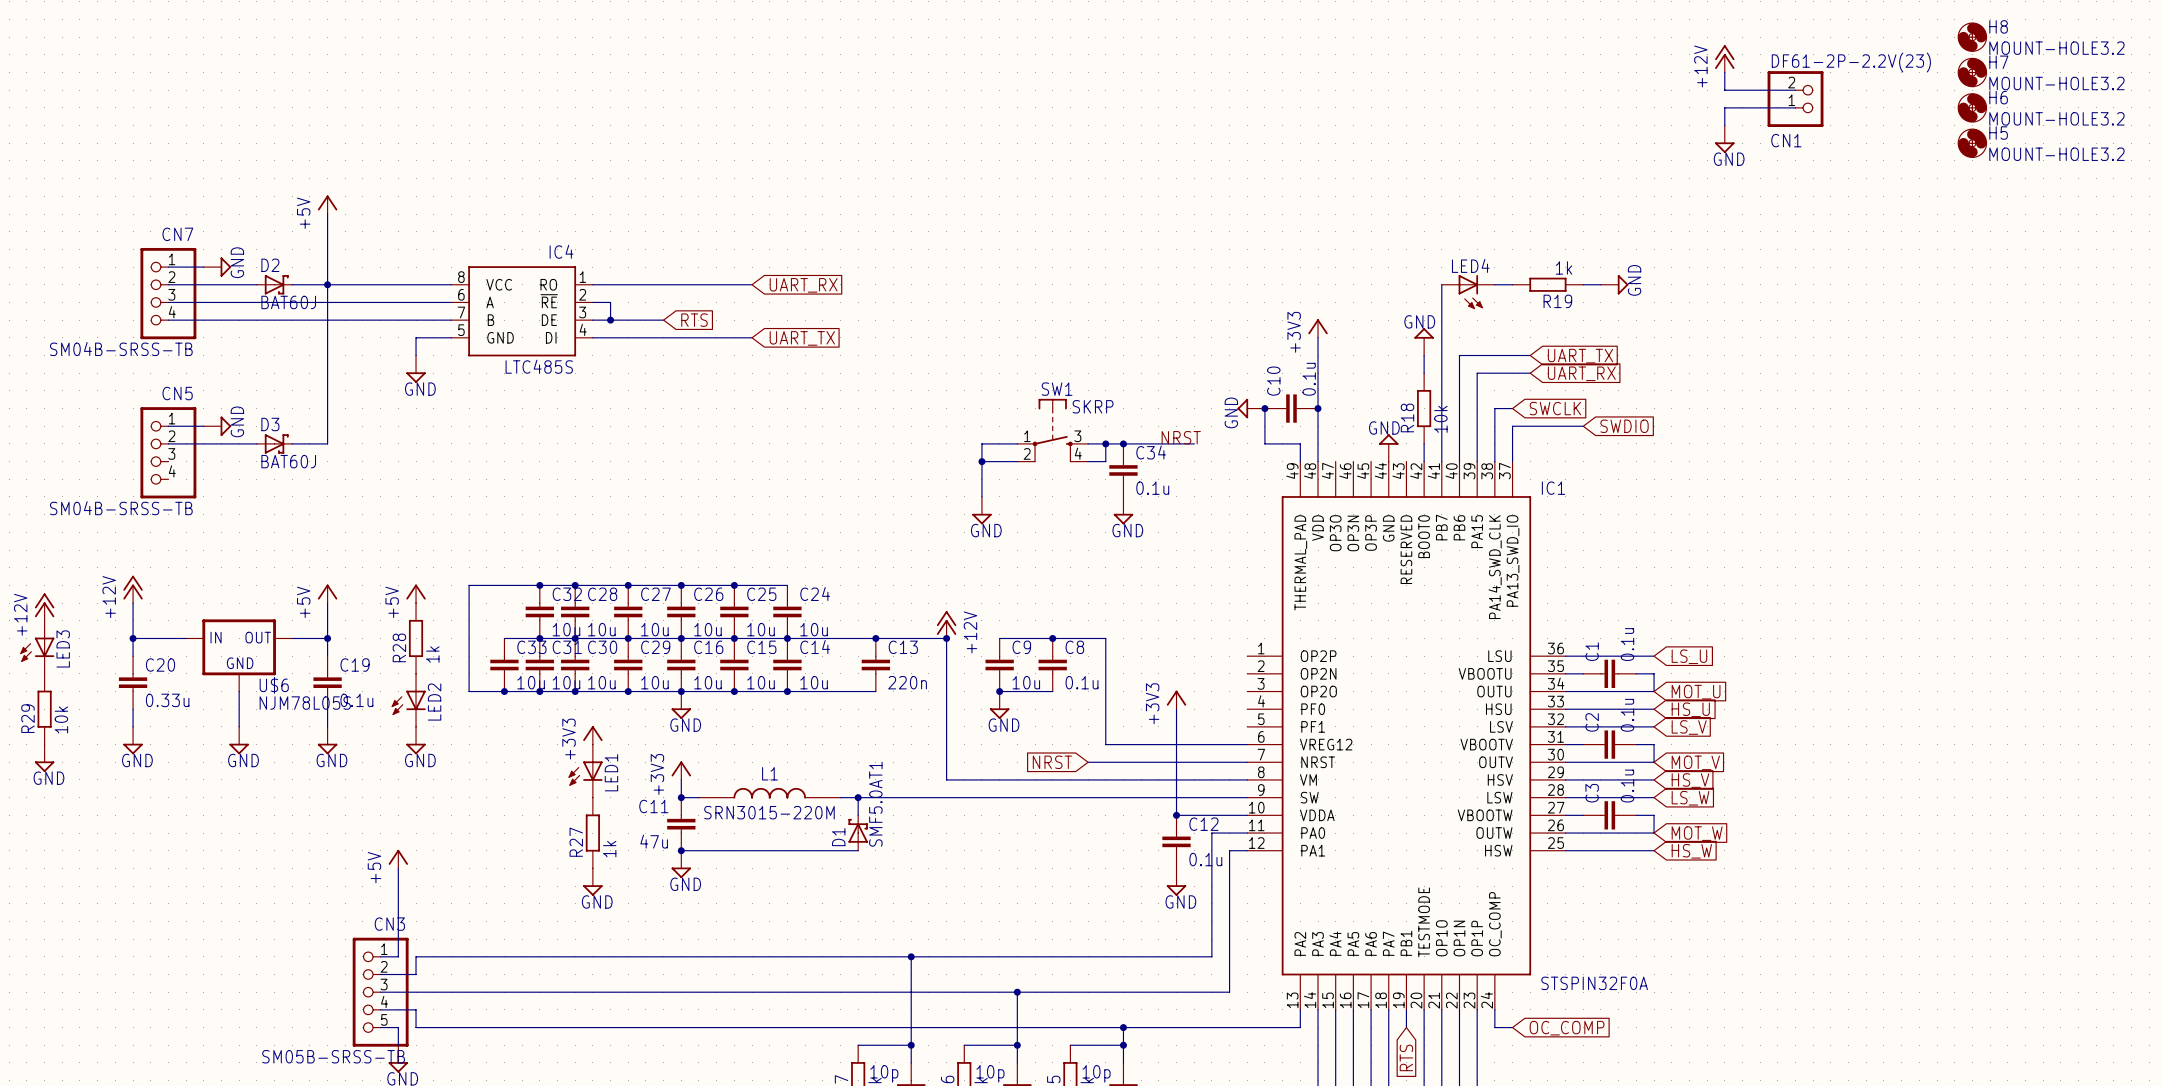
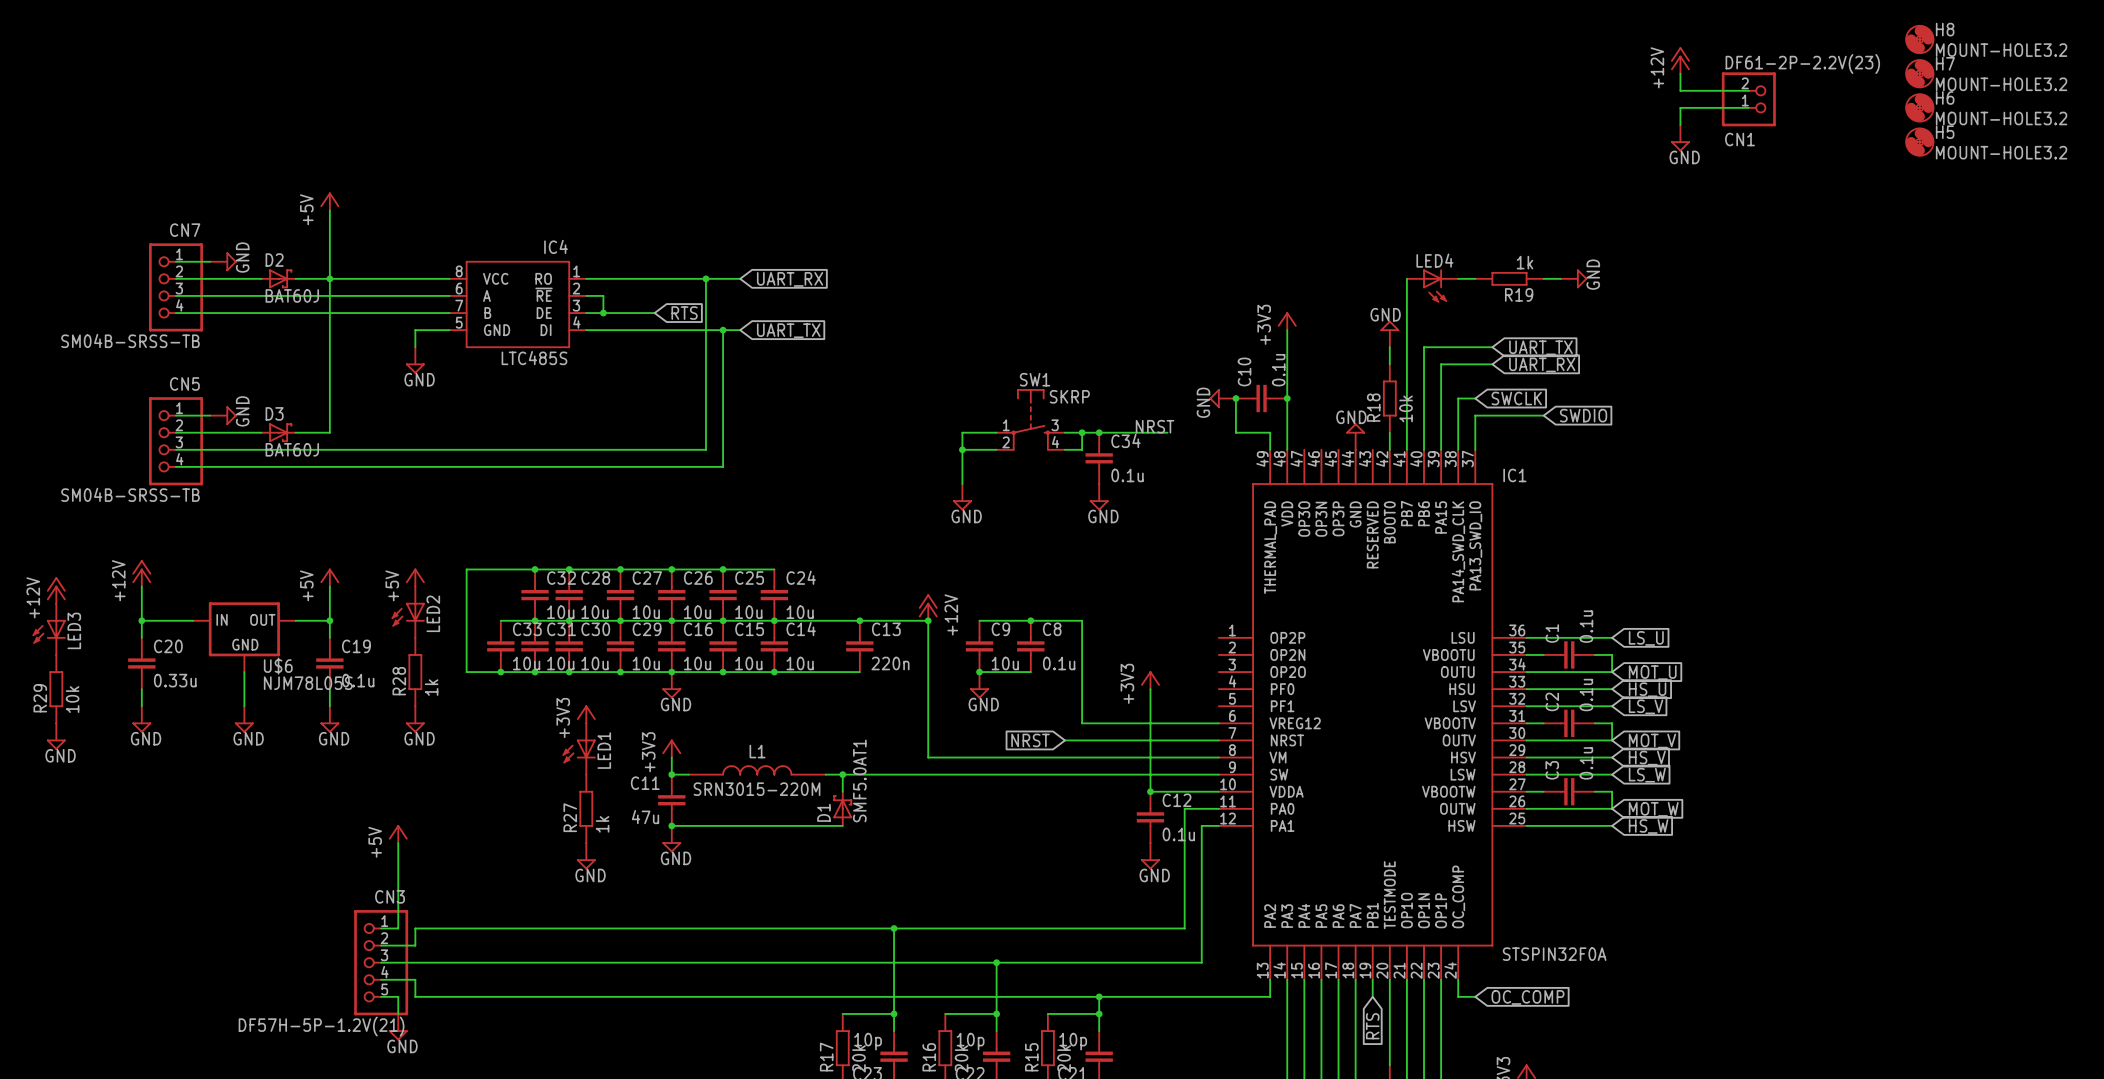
wire: none -> (705, 278) (705, 449) (176, 449)
junction: none -> (705, 278)
wire: none -> (723, 330) (723, 466) (176, 466)
junction: none -> (723, 330)
R28 position: (416, 638) -> (415, 672)
LED2 position: (408, 700) -> (408, 612)
CN3 value: SM05B-SRSS-TB (333, 1056) -> DF57H-5P-1.2V(21) (321, 1026)

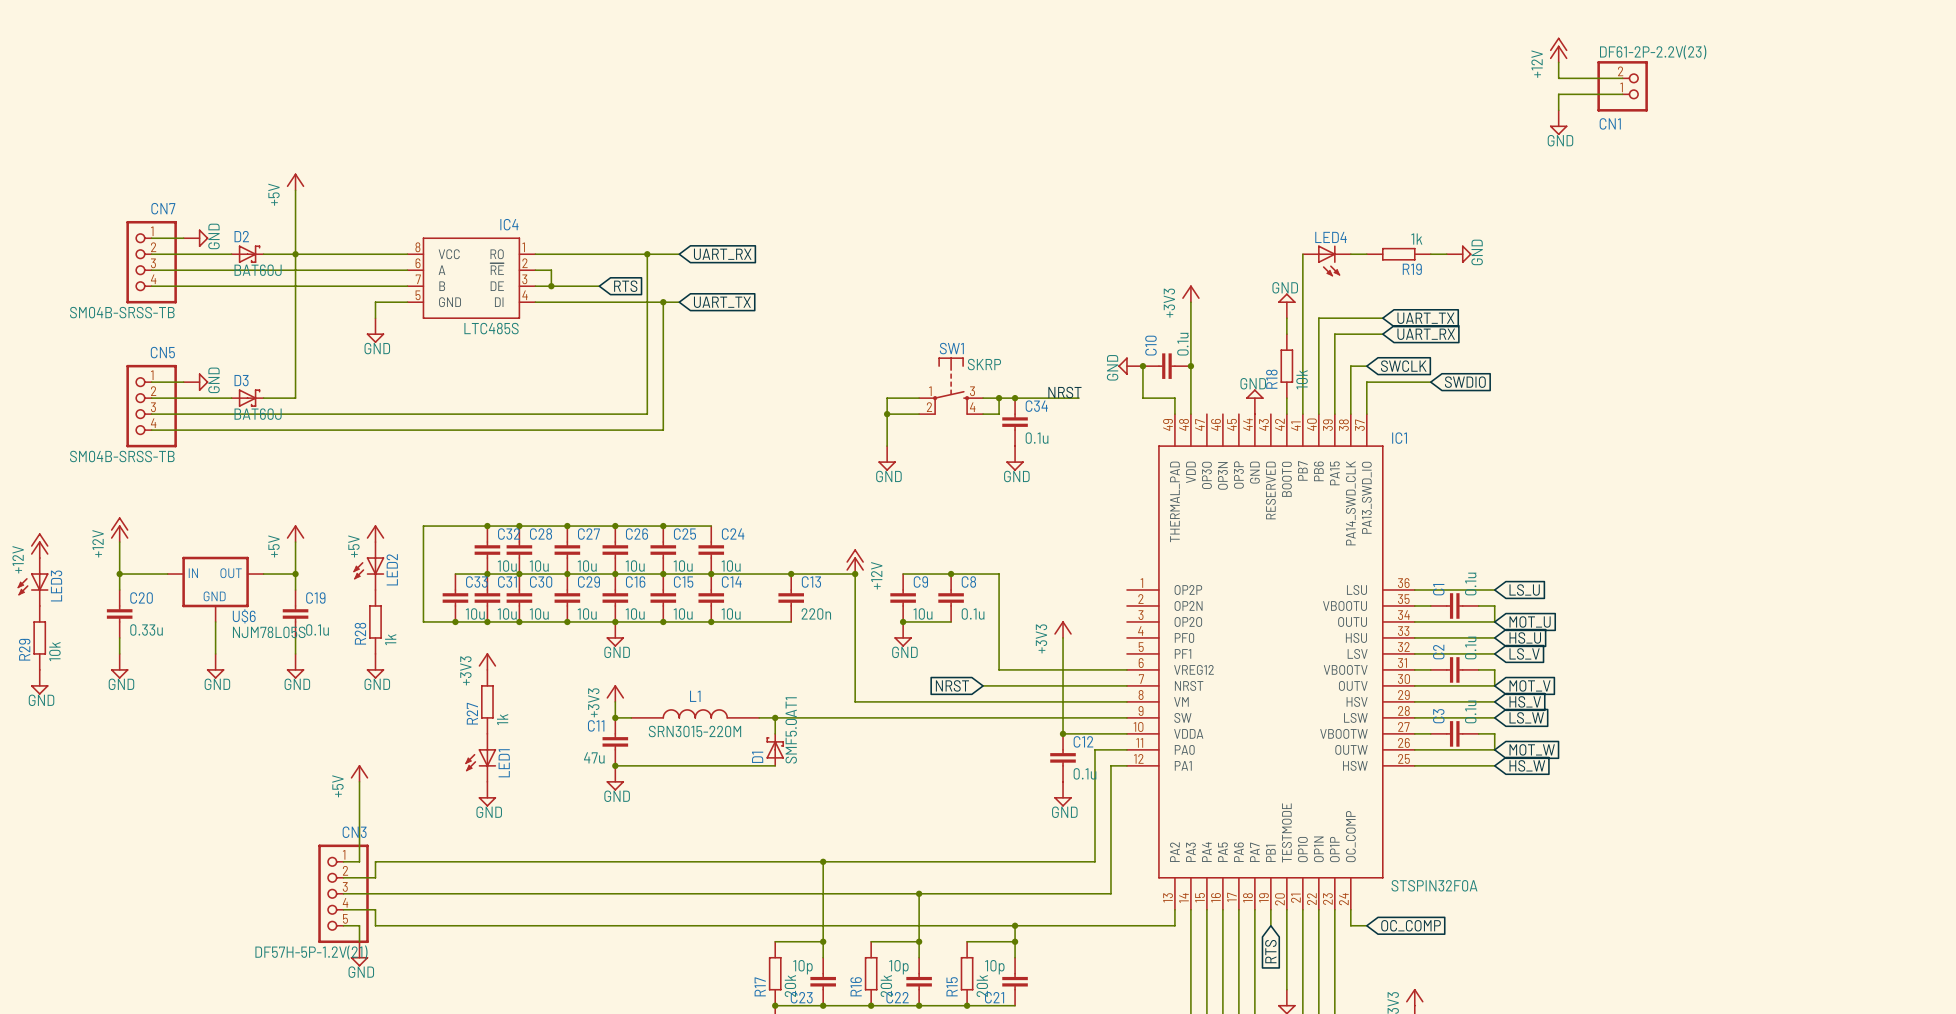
H8: MOUNT-HOLE3.2 (1919, 39) -> none
H7: MOUNT-HOLE3.2 (1919, 73) -> none
H6: MOUNT-HOLE3.2 (1919, 107) -> none
H5: MOUNT-HOLE3.2 (1919, 142) -> none
power symbol position: +3V3 (586, 714) -> +3V3 (487, 661)
LED1 position: (579, 748) -> (480, 757)
R27 position: (586, 808) -> (487, 701)
power symbol position: GND (586, 856) -> GND (487, 794)

